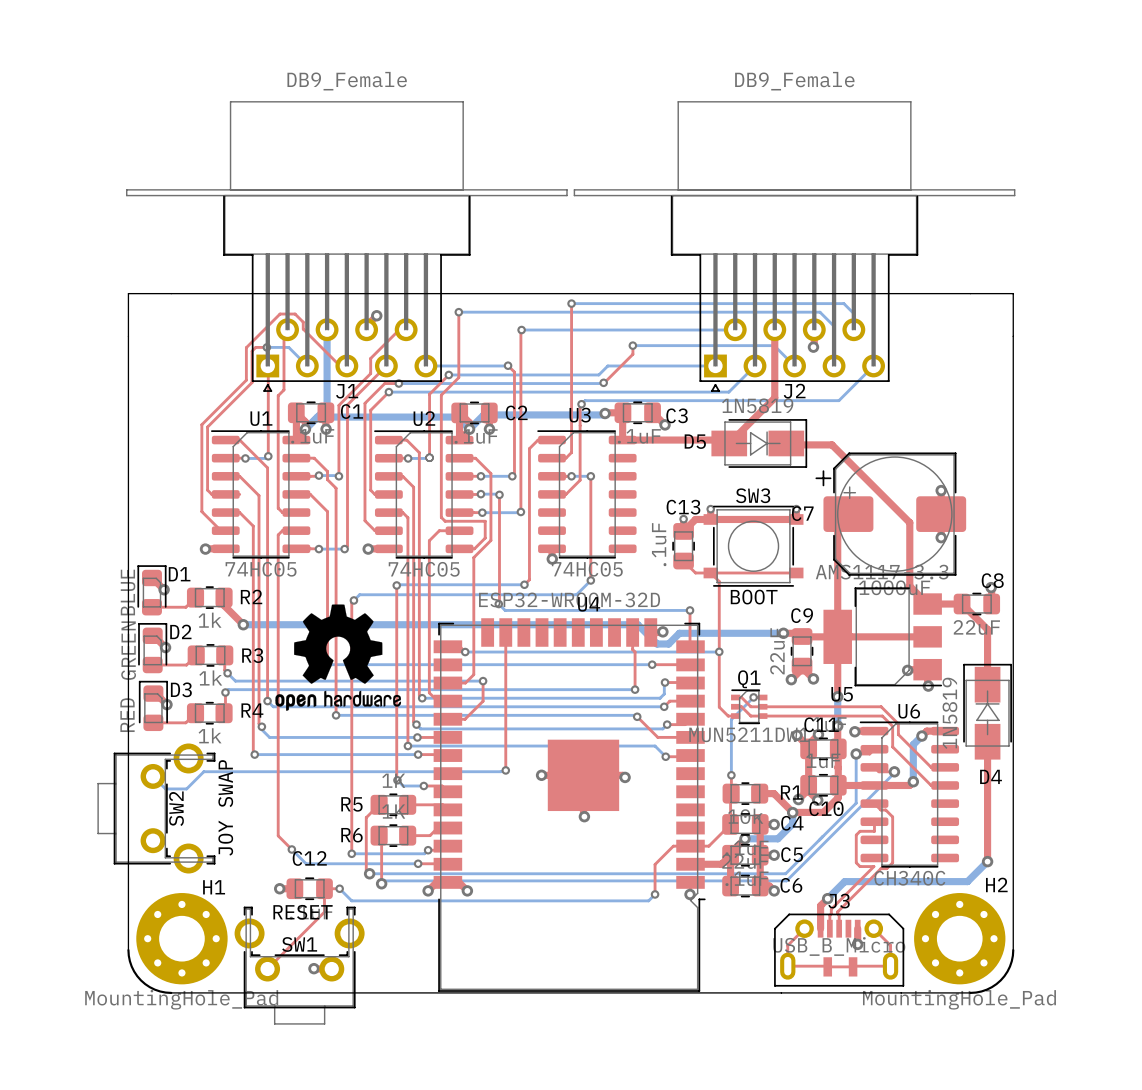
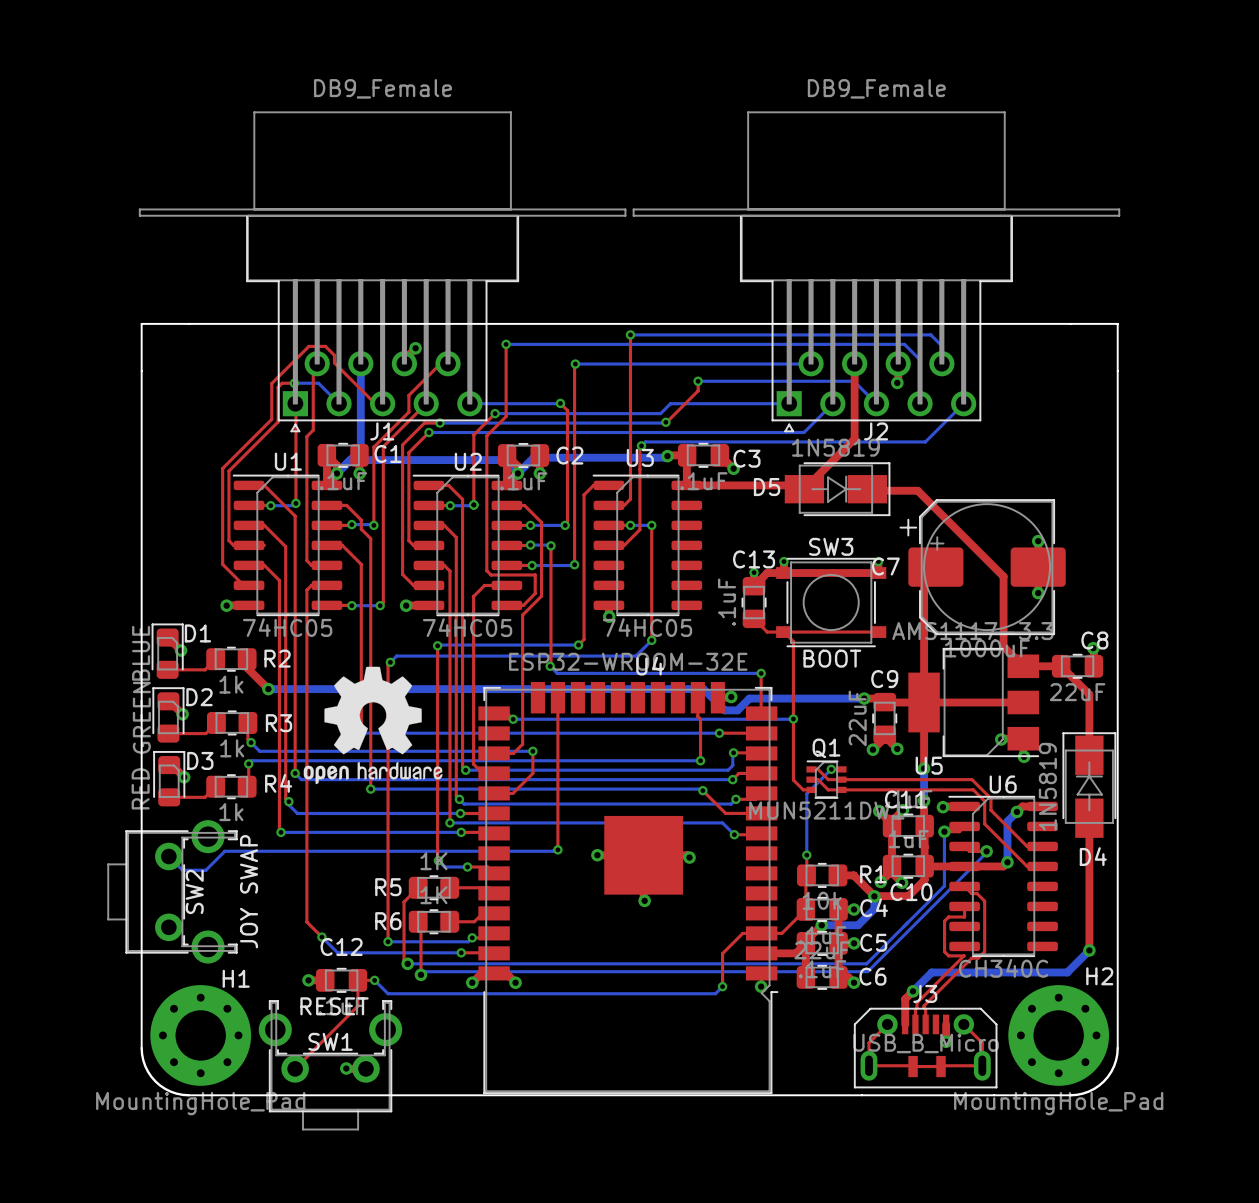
U4 value: ESP32-WROOM-32D (569, 599) -> ESP32-WROOM-32E (628, 661)

